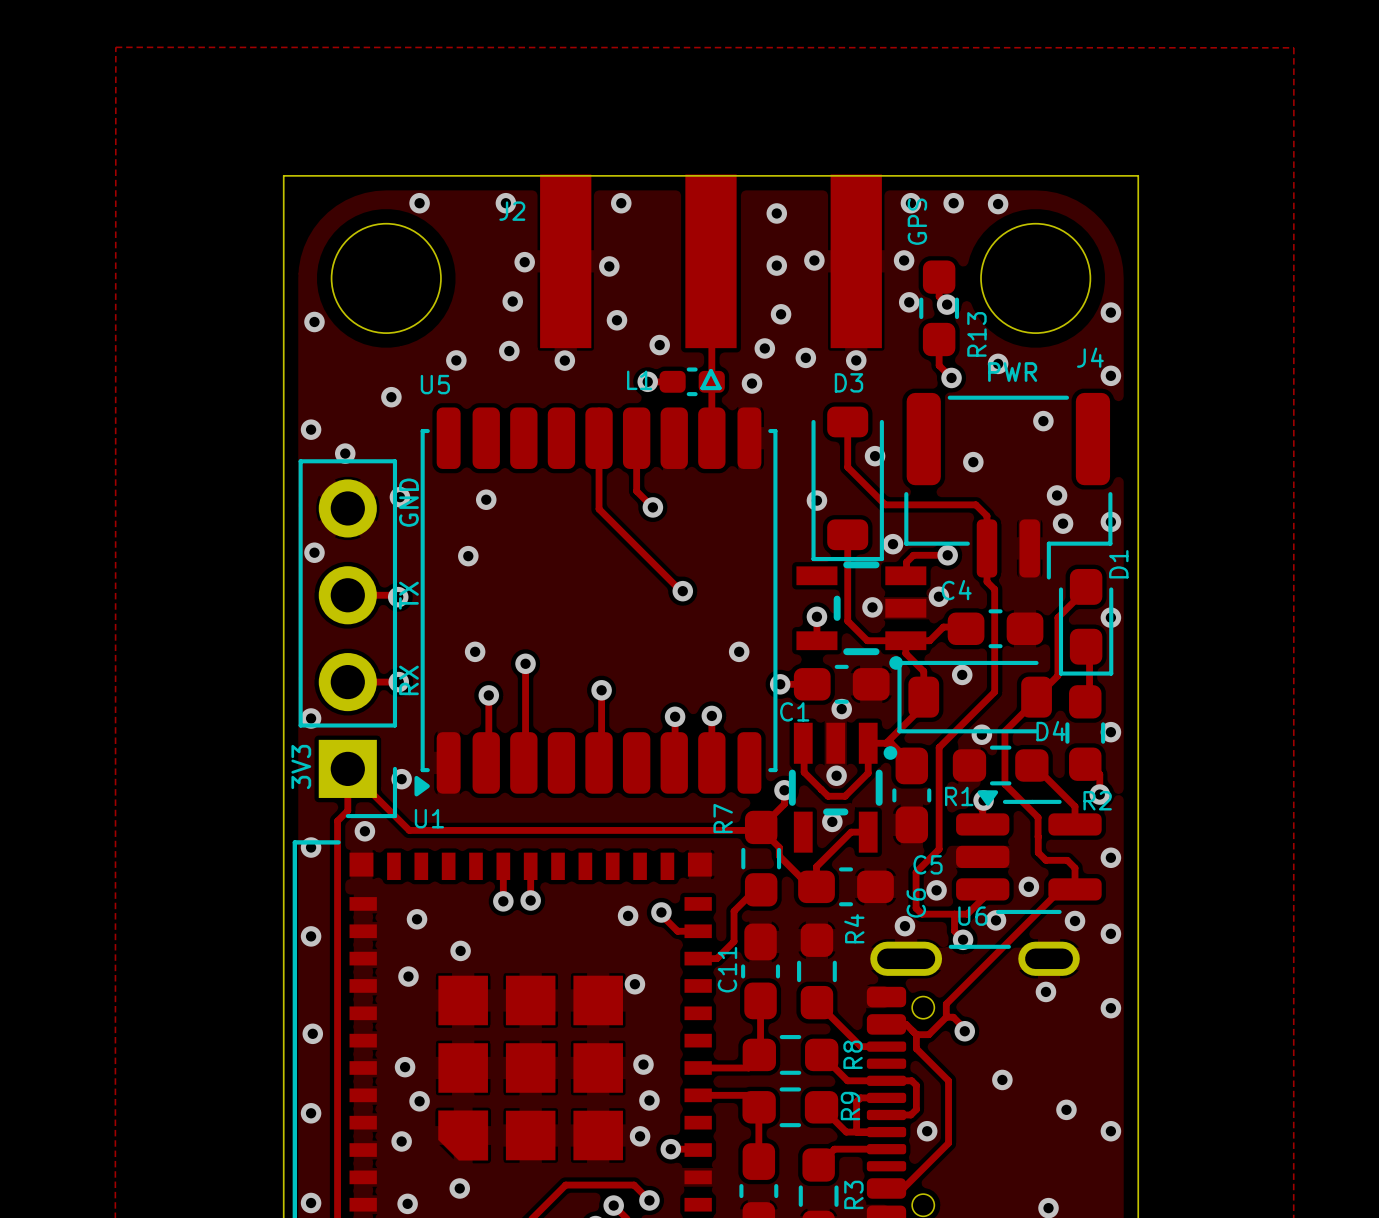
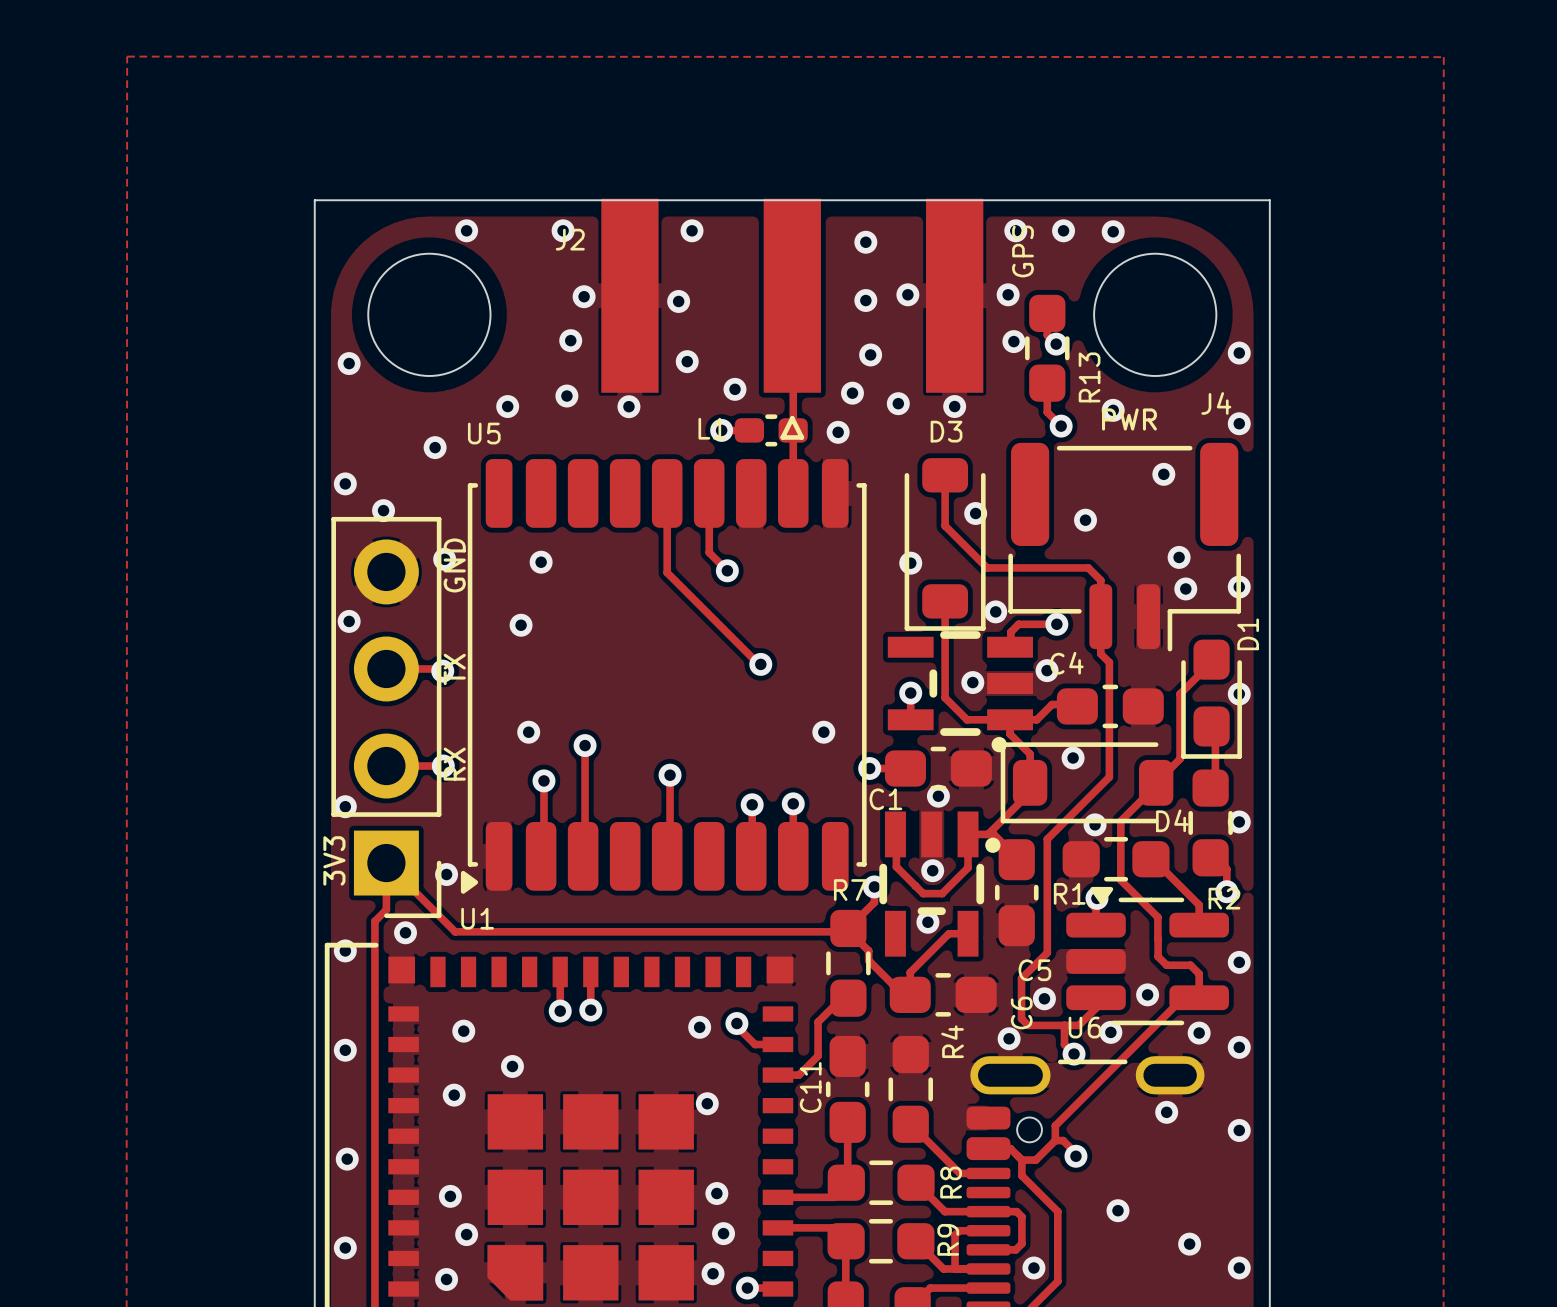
R7 name rotation: 0° (723, 818) -> 90° clockwise (850, 890)
R7 name position: R7 (723, 818) -> R7 (850, 890)

